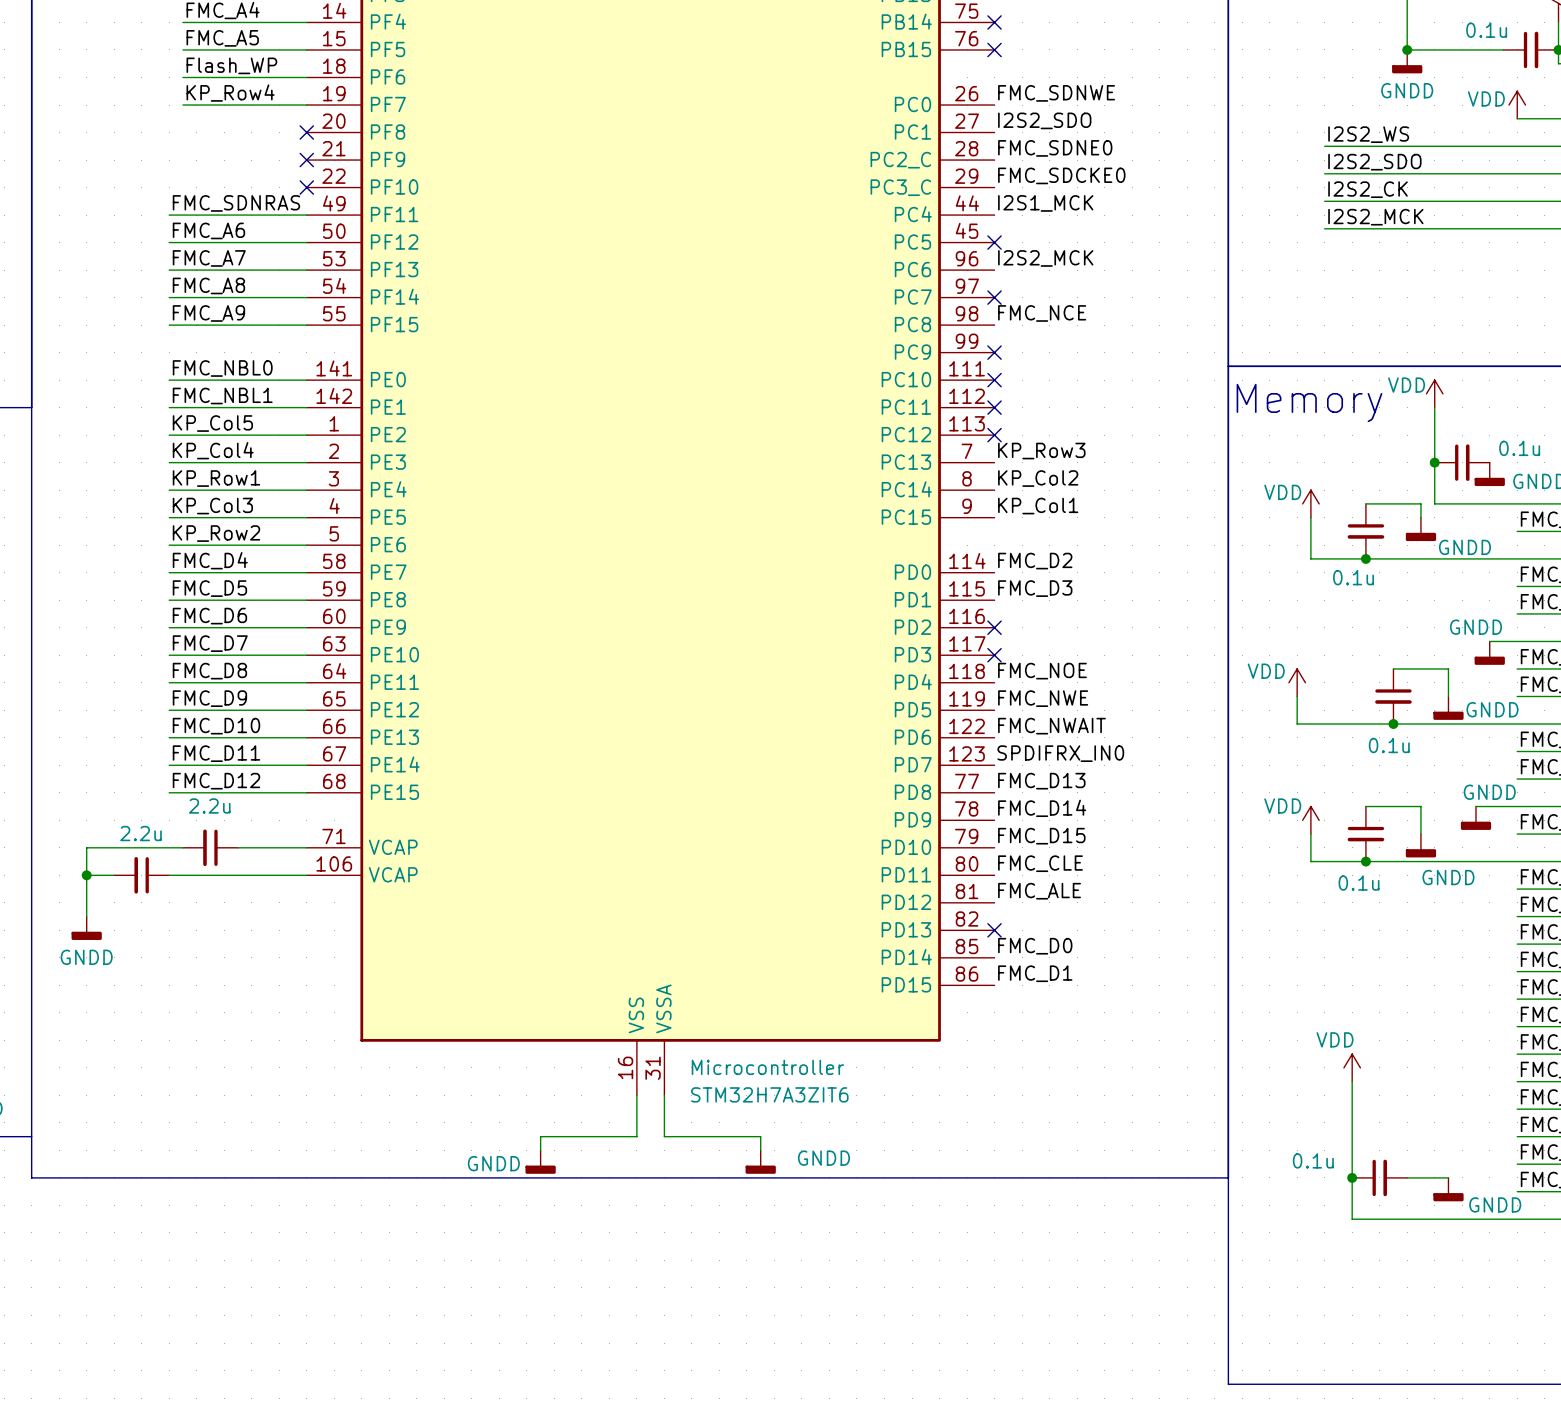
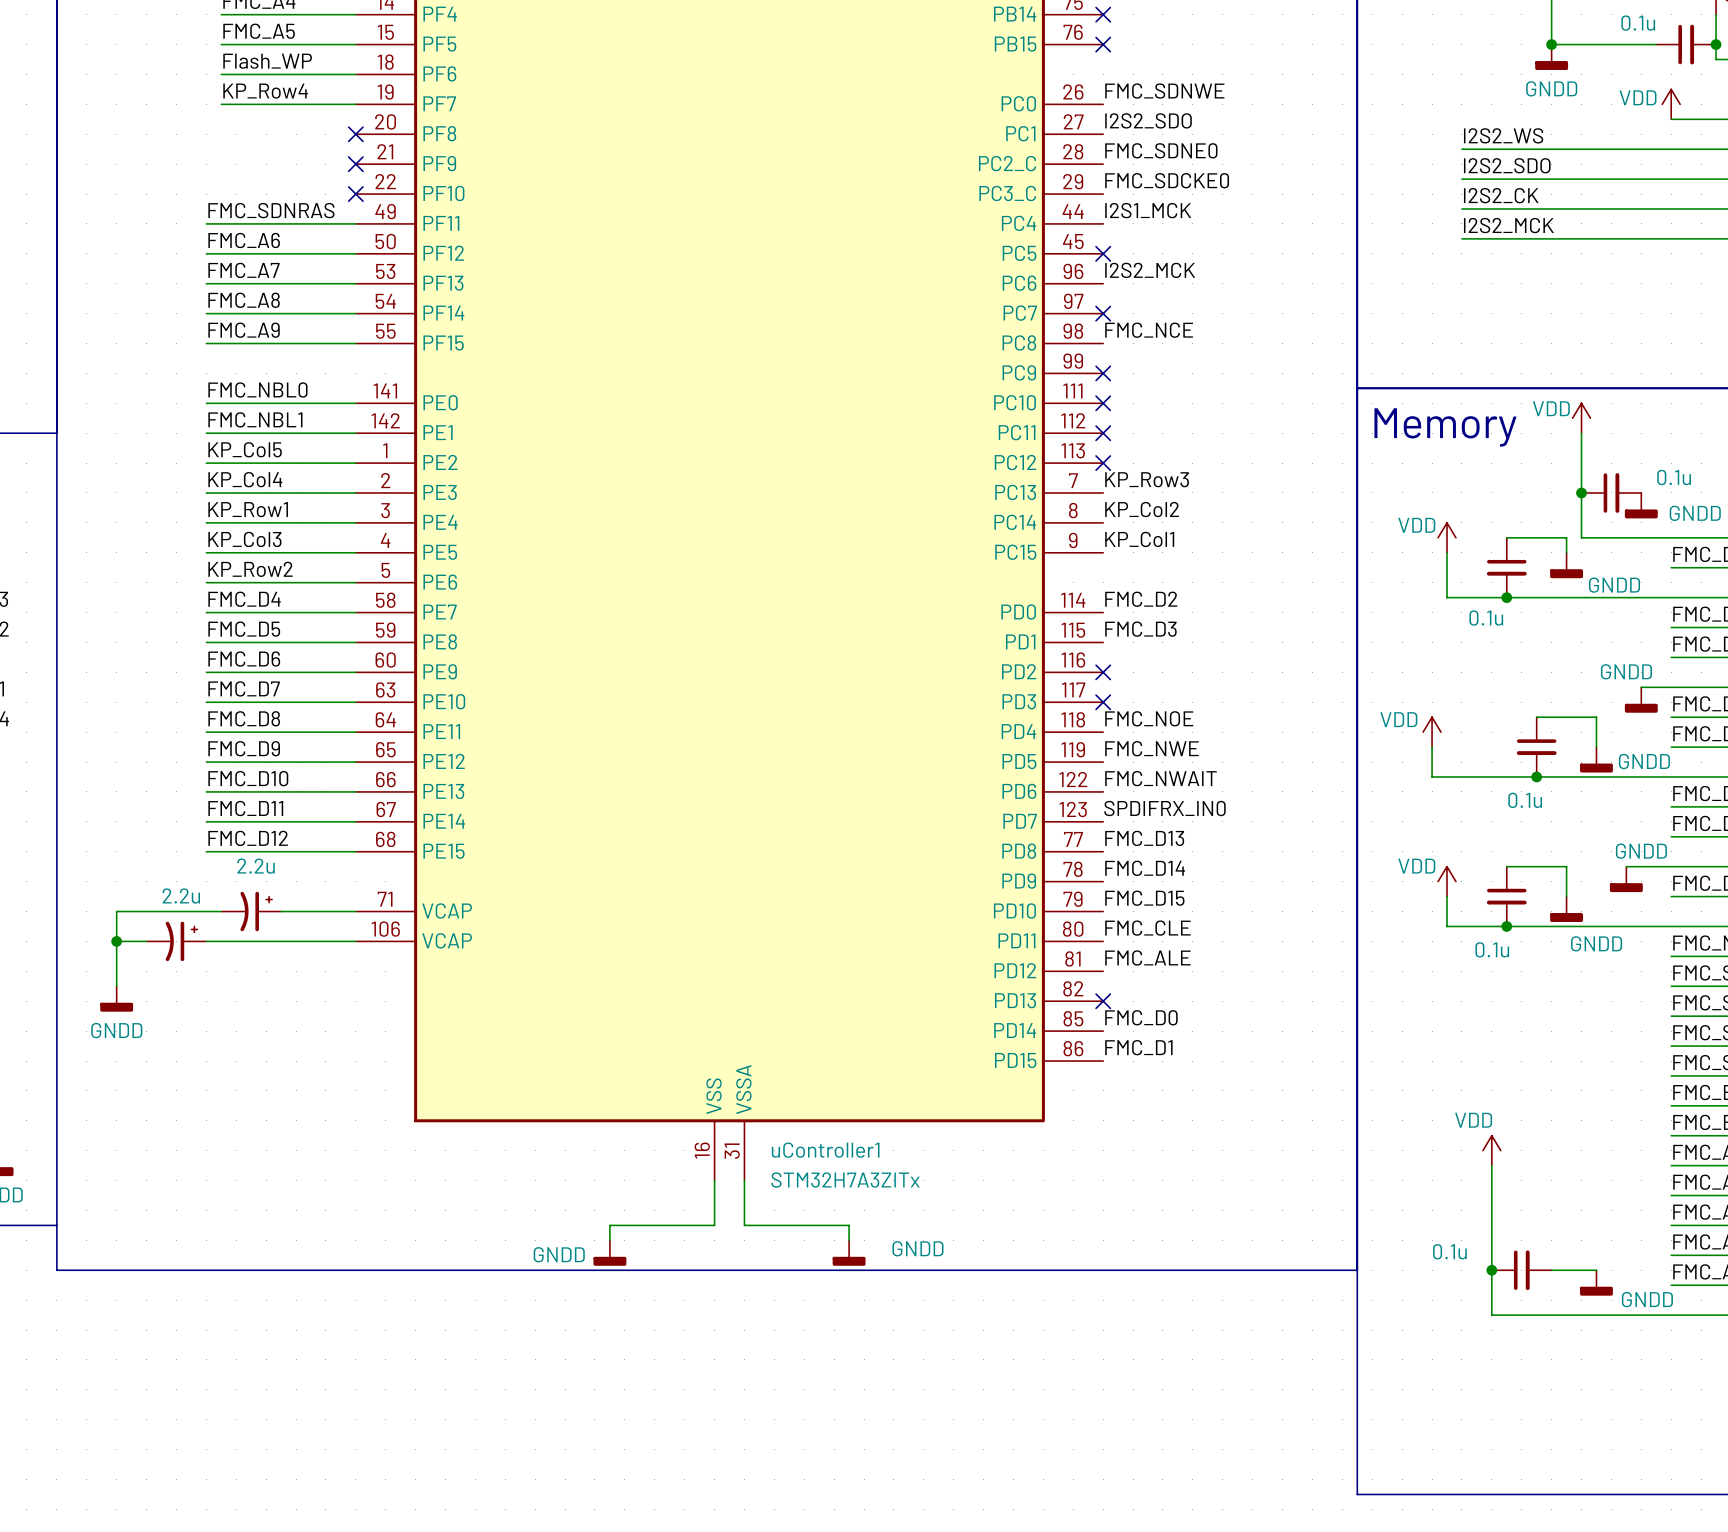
part symbol: [182, 829, 238, 867] -> [221, 891, 282, 932]
part symbol: [114, 857, 170, 894] -> [146, 921, 207, 962]
Microcontroller name: Microcontroller (767, 1067) -> uController1 (825, 1150)
Microcontroller value: STM32H7A3ZIT6 (769, 1094) -> STM32H7A3ZITx (845, 1180)

